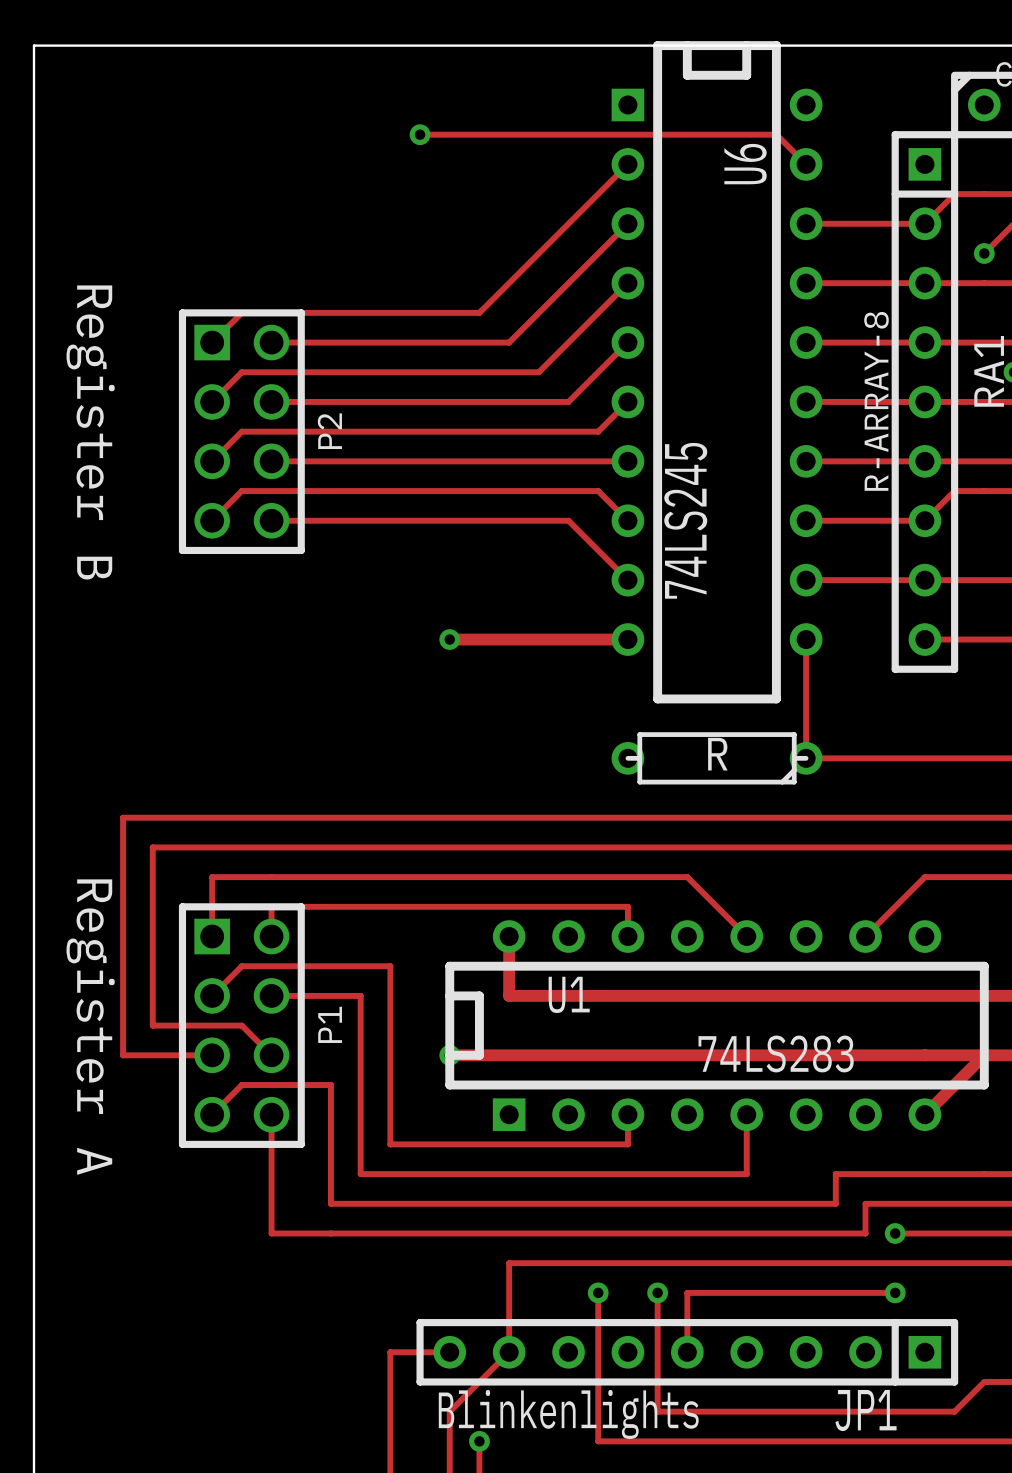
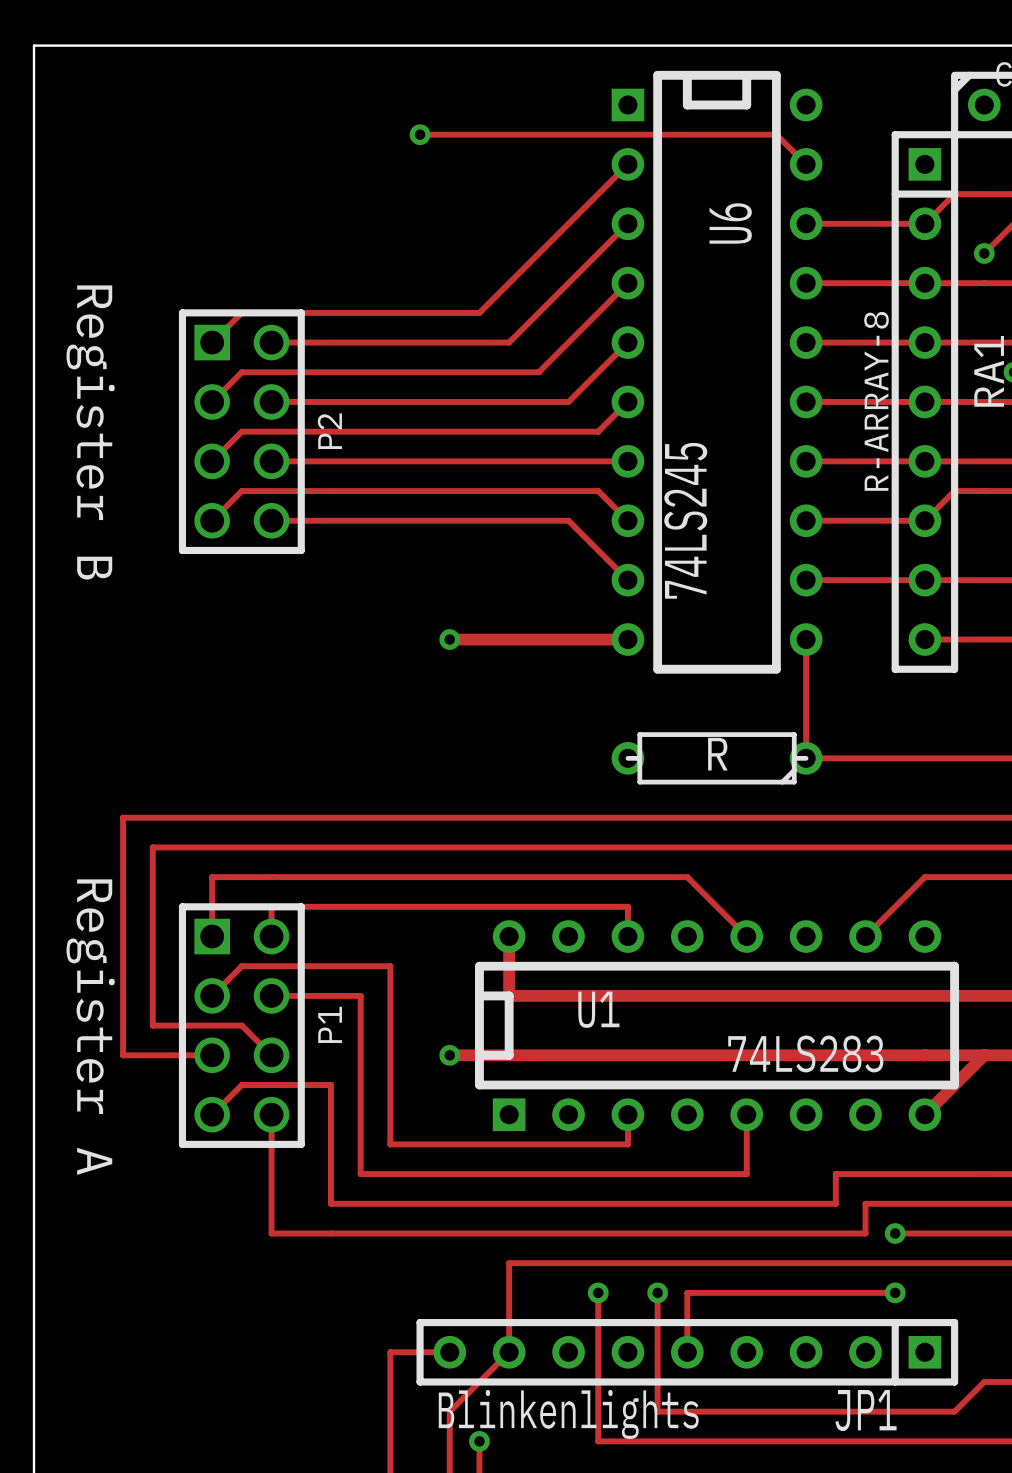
U6 footprint: [611, 41, 823, 704] -> [611, 70, 823, 674]
U6 name position: U6 (745, 164) -> U6 (730, 223)
U1 footprint: [445, 920, 989, 1132] -> [475, 920, 960, 1132]

